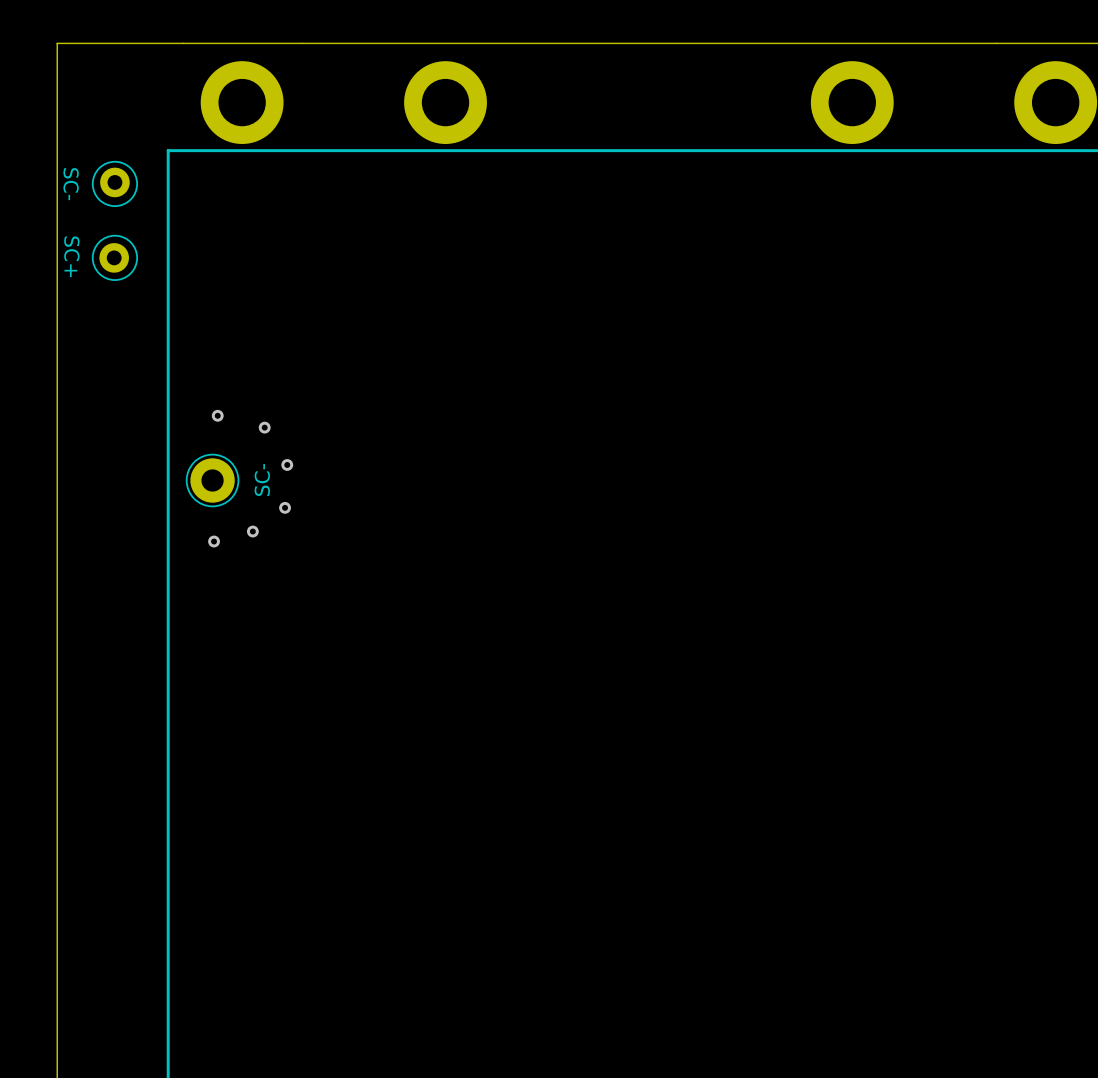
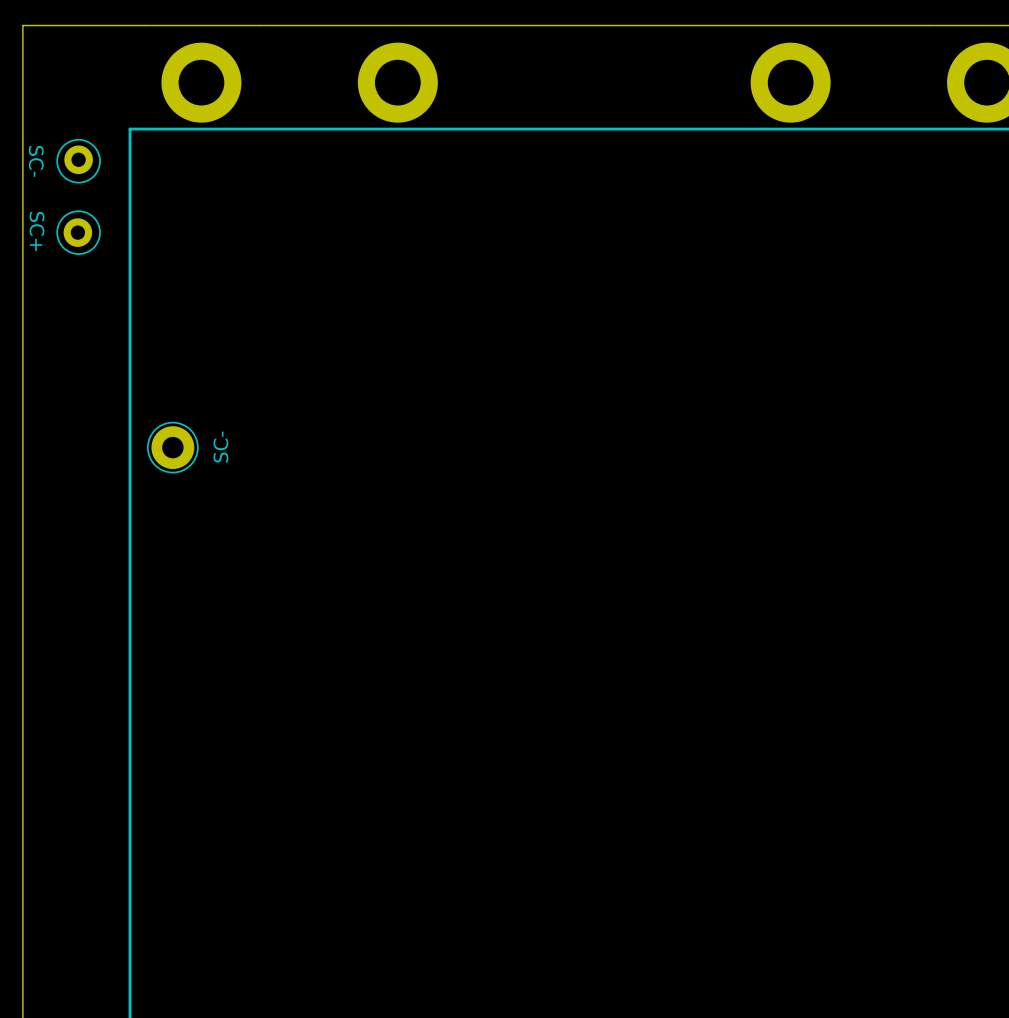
via: (217, 415) -> none
via: (264, 427) -> none
via: (287, 464) -> none
via: (285, 507) -> none
via: (252, 531) -> none
via: (214, 541) -> none

